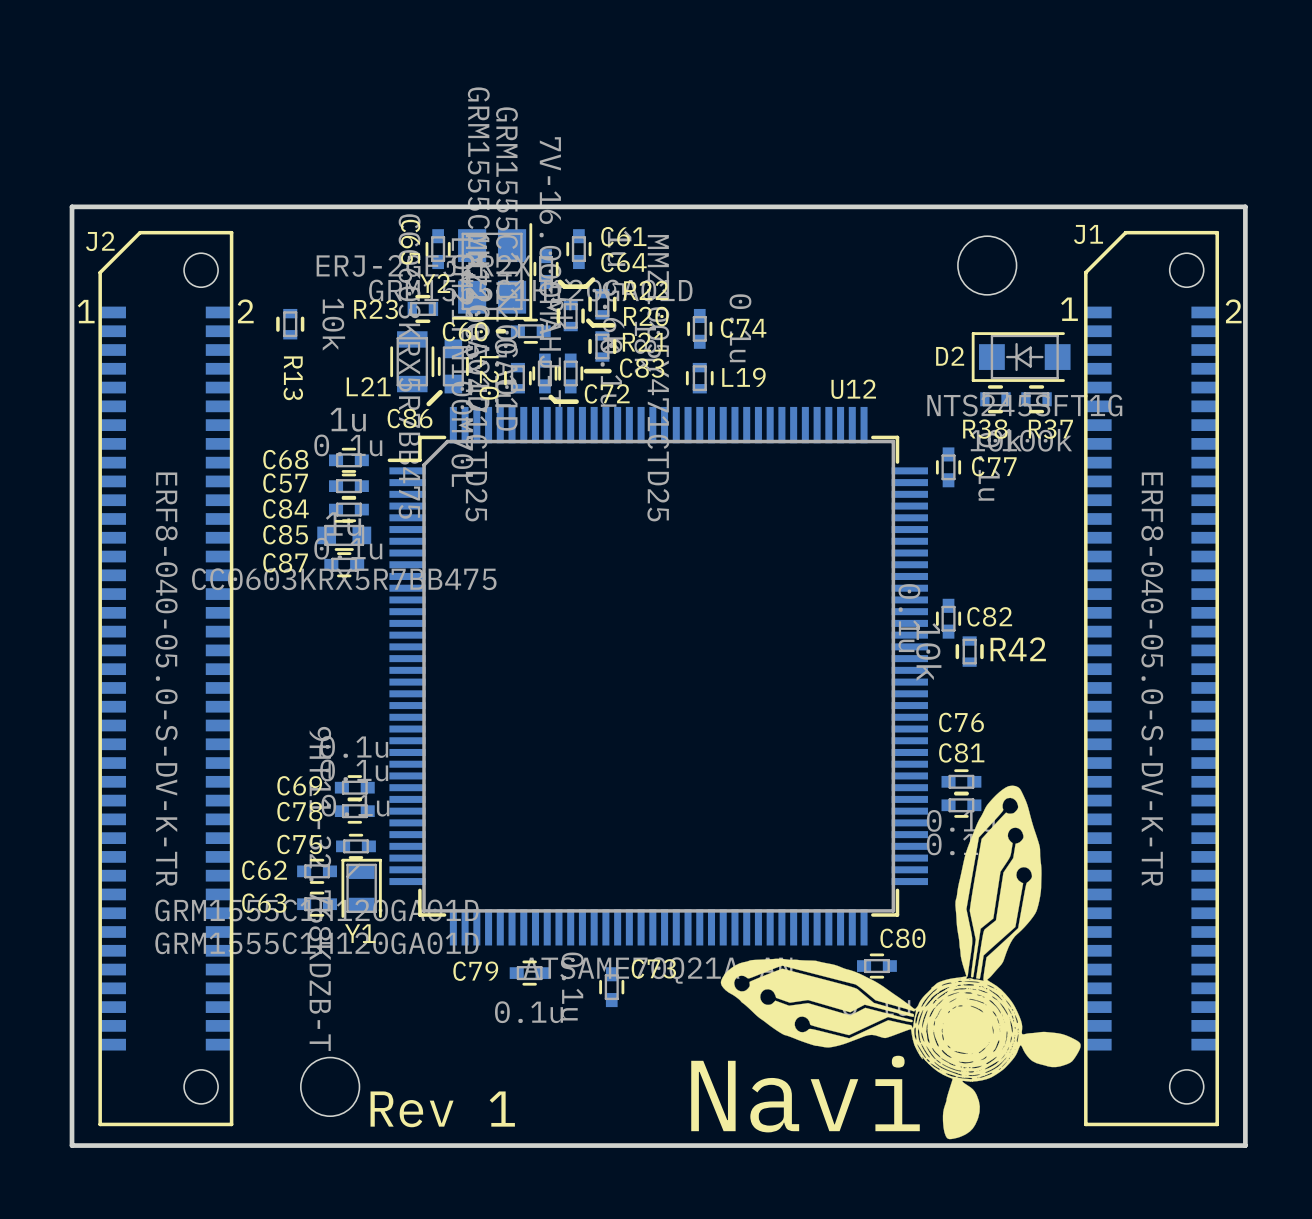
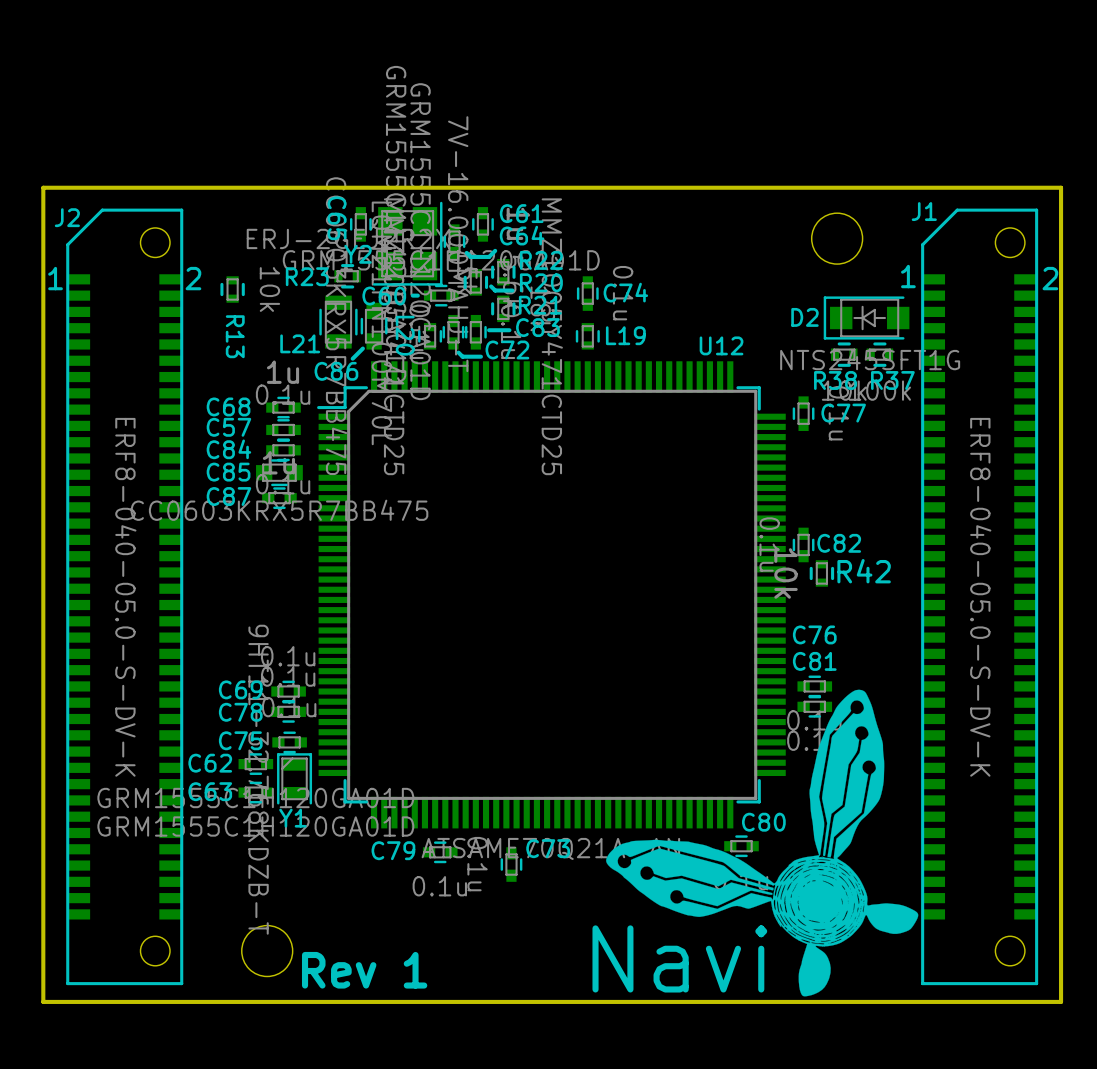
J2 value: ERF8-040-05.0-S-DV-K-TR (166, 679) -> ERF8-040-05.0-S-DV-K (125, 597)
J1 value: ERF8-040-05.0-S-DV-K-TR (1152, 679) -> ERF8-040-05.0-S-DV-K (980, 597)

